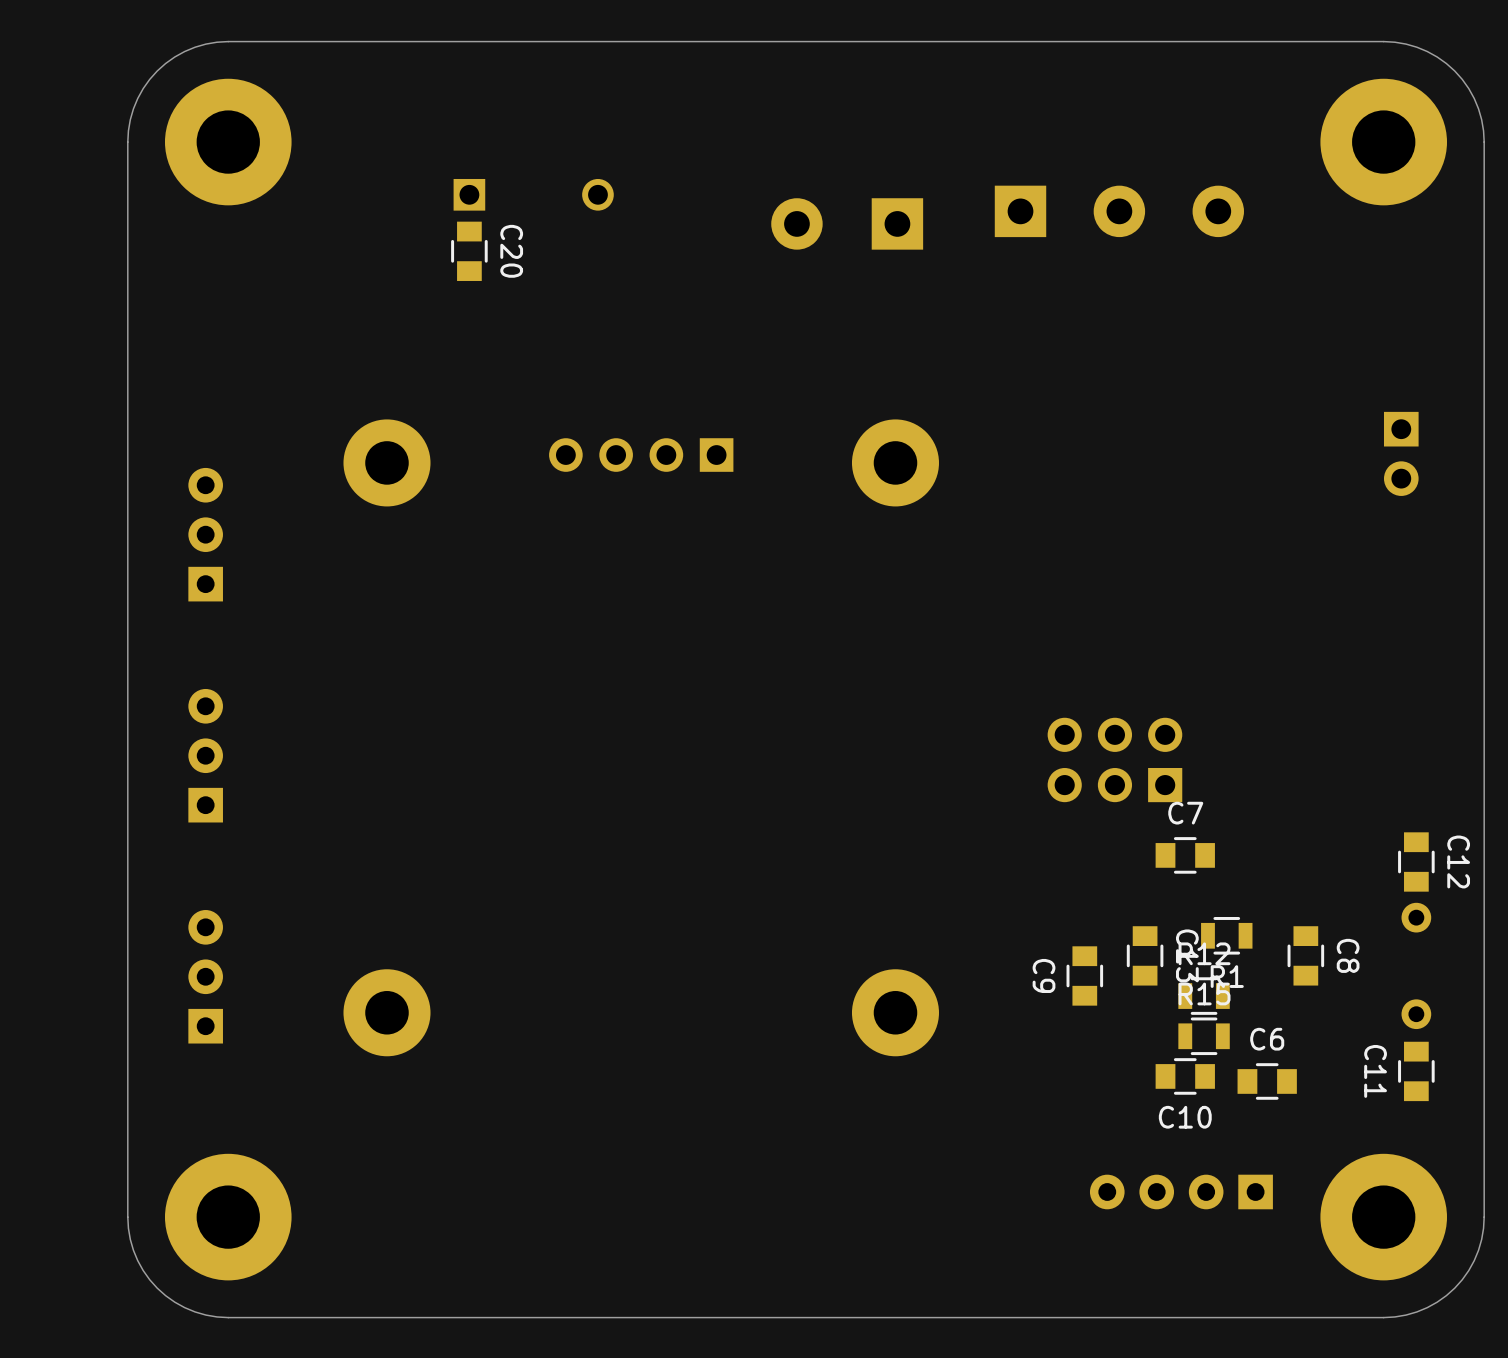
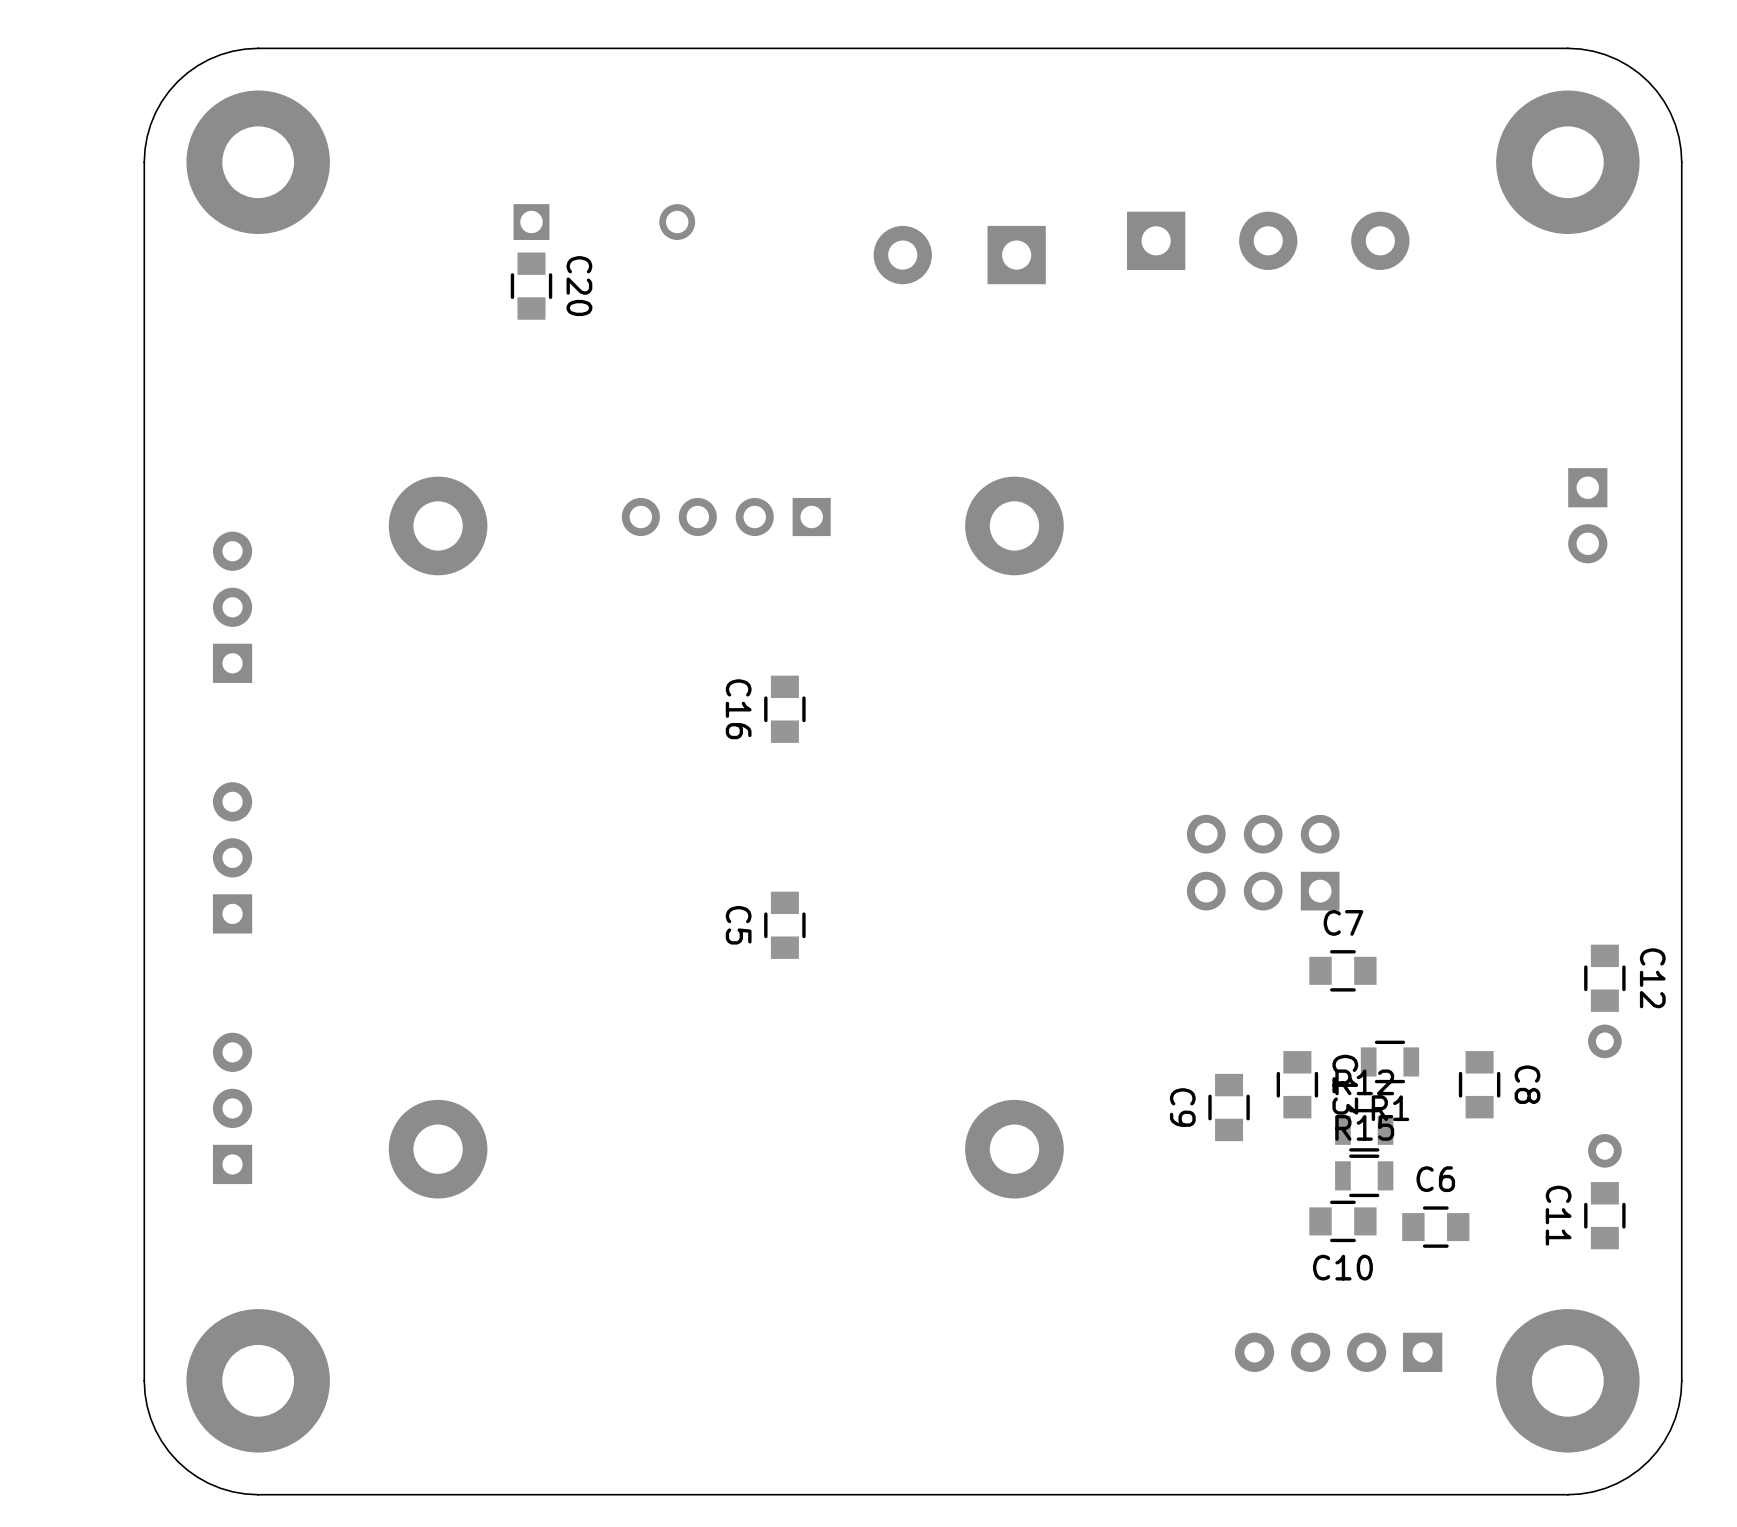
C16: none -> (784, 709)
C5: none -> (784, 925)

